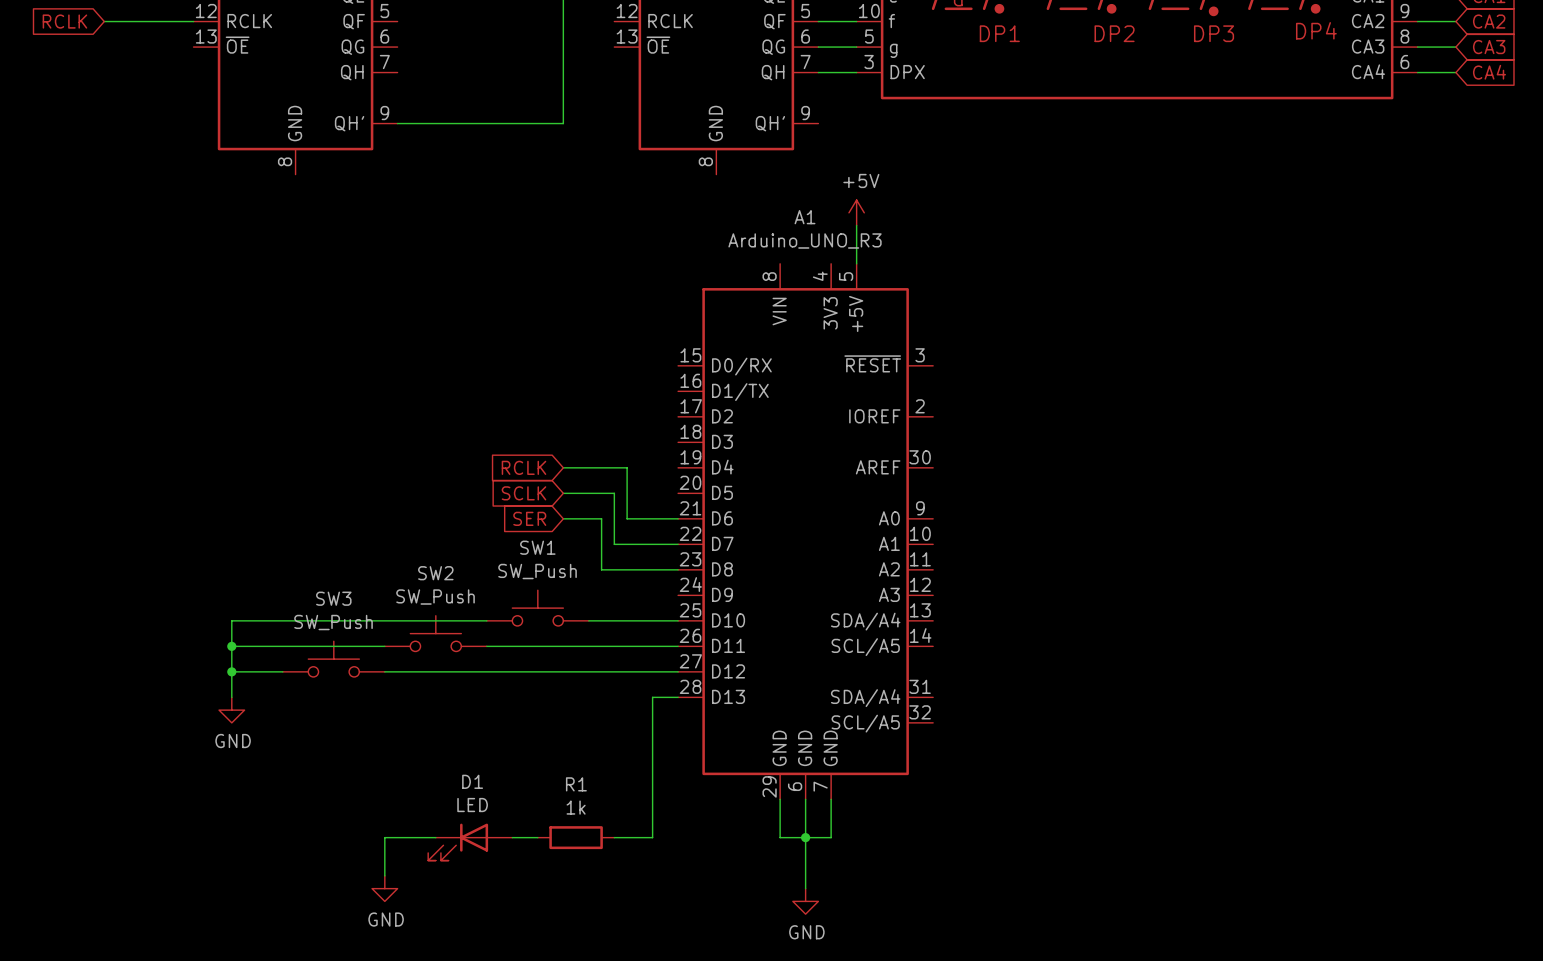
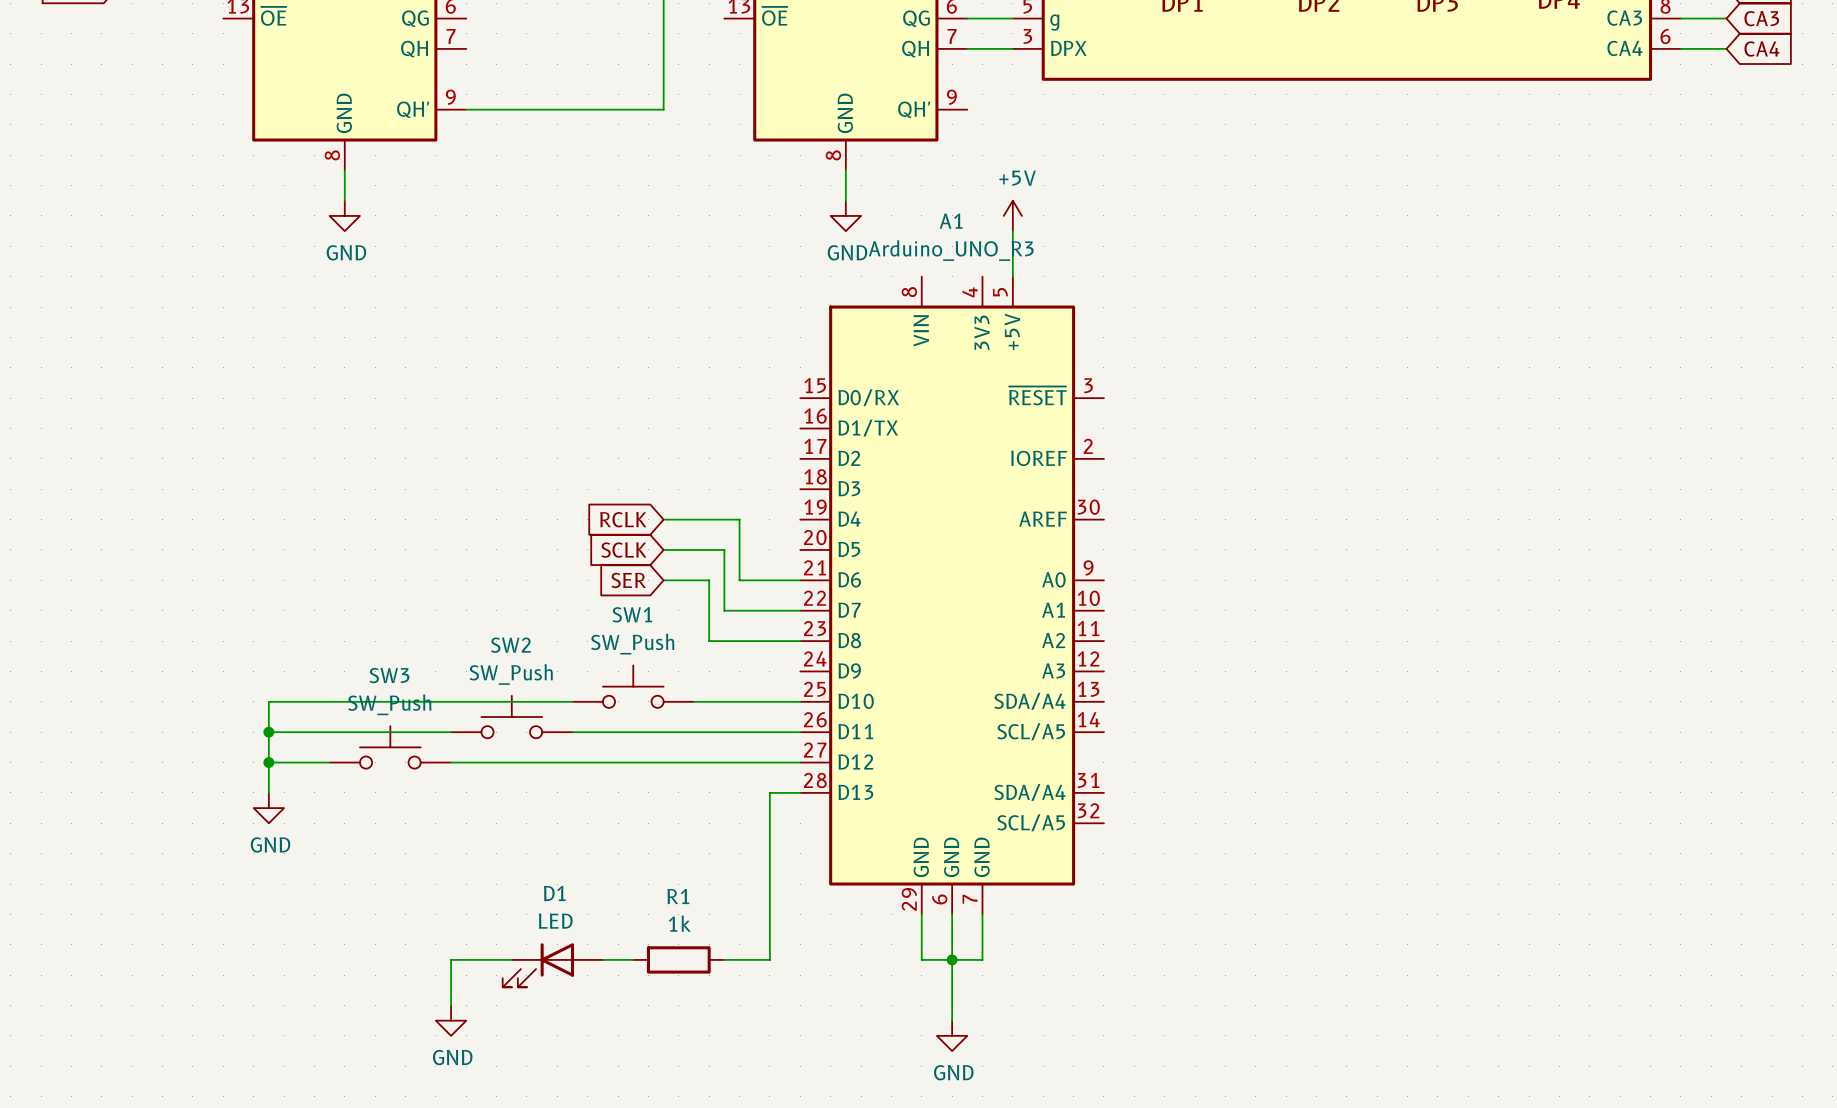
wire: none -> (344, 170) (344, 200)
wire: none -> (845, 170) (845, 200)
power symbol: none -> GND (344, 215)
power symbol: none -> GND (845, 215)

